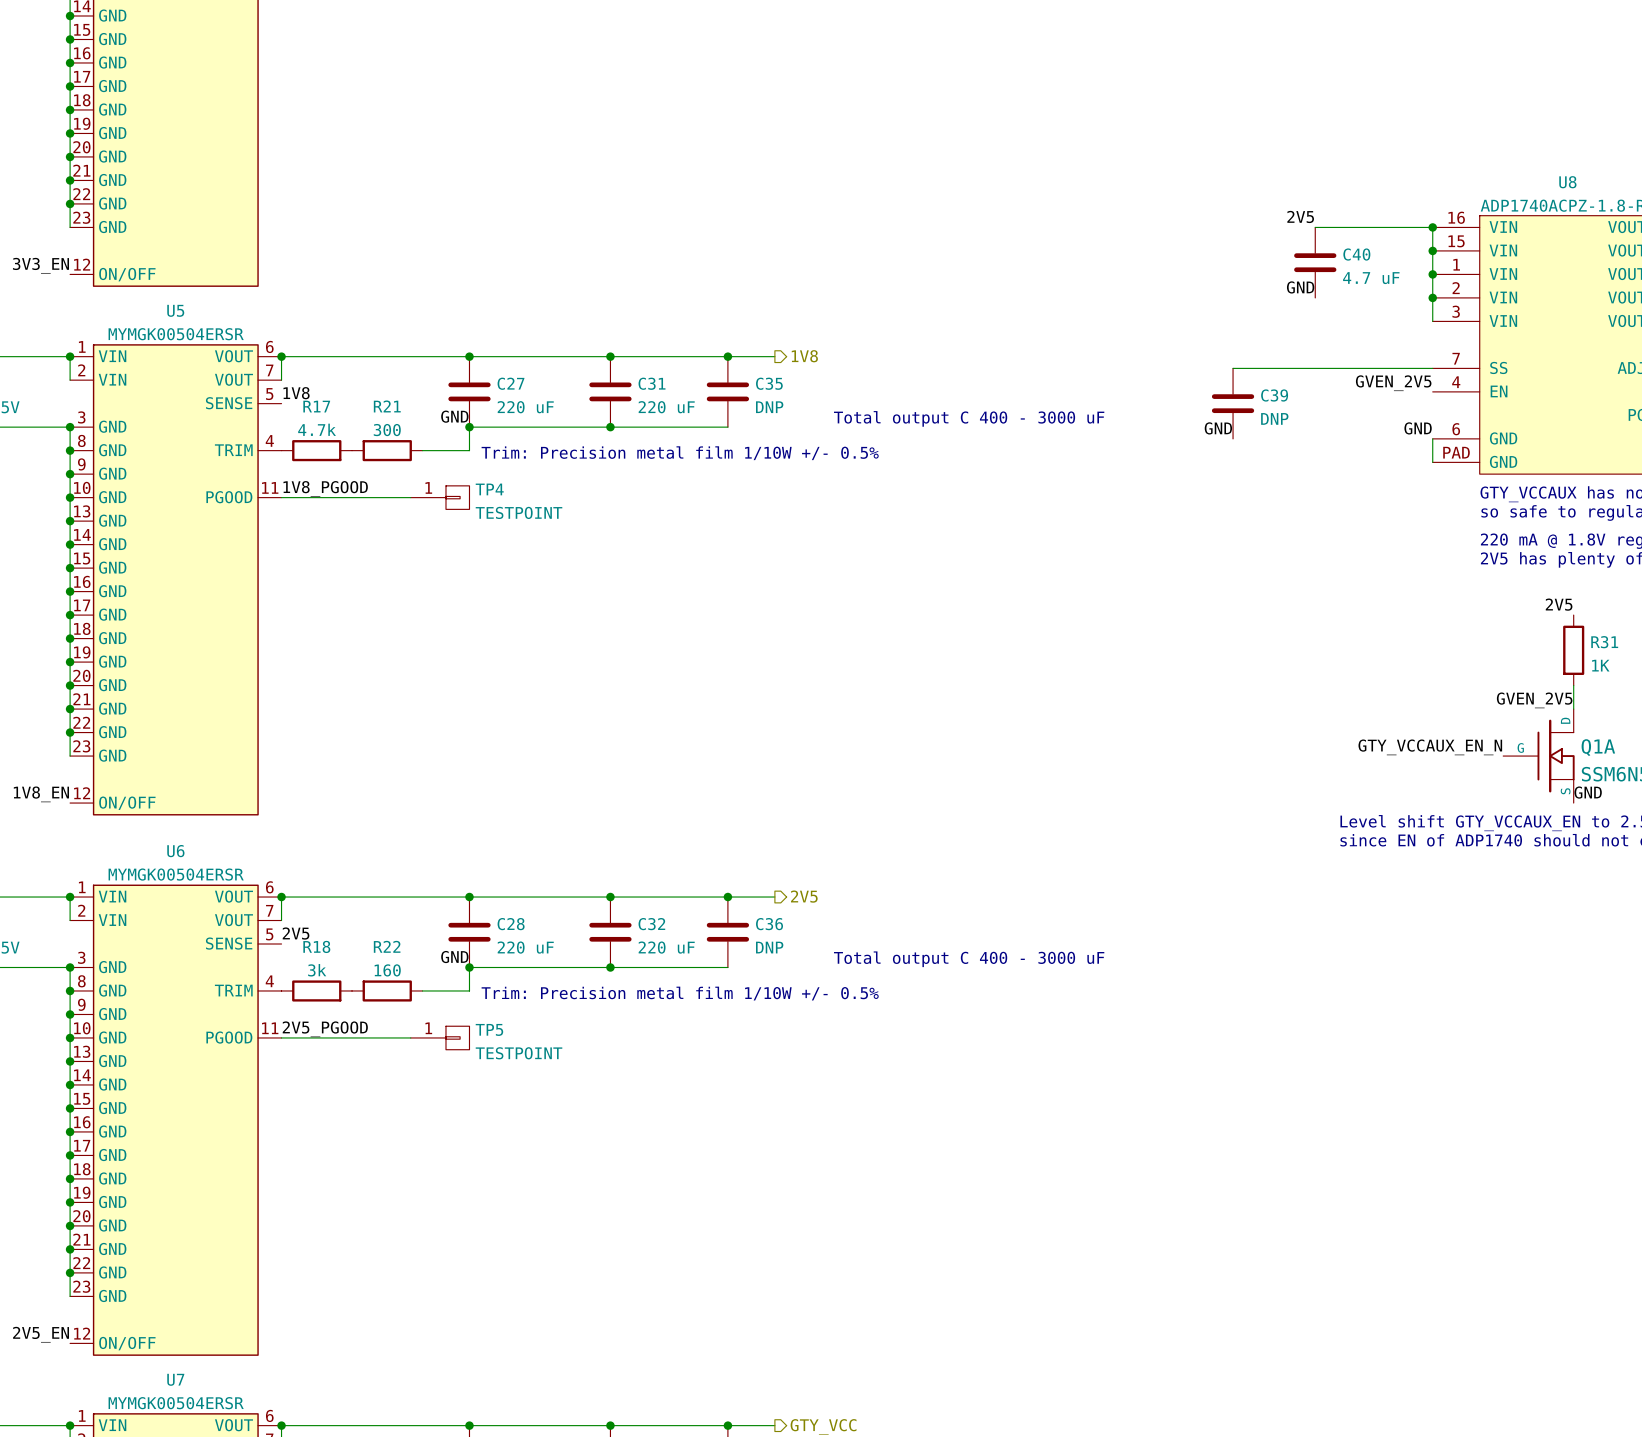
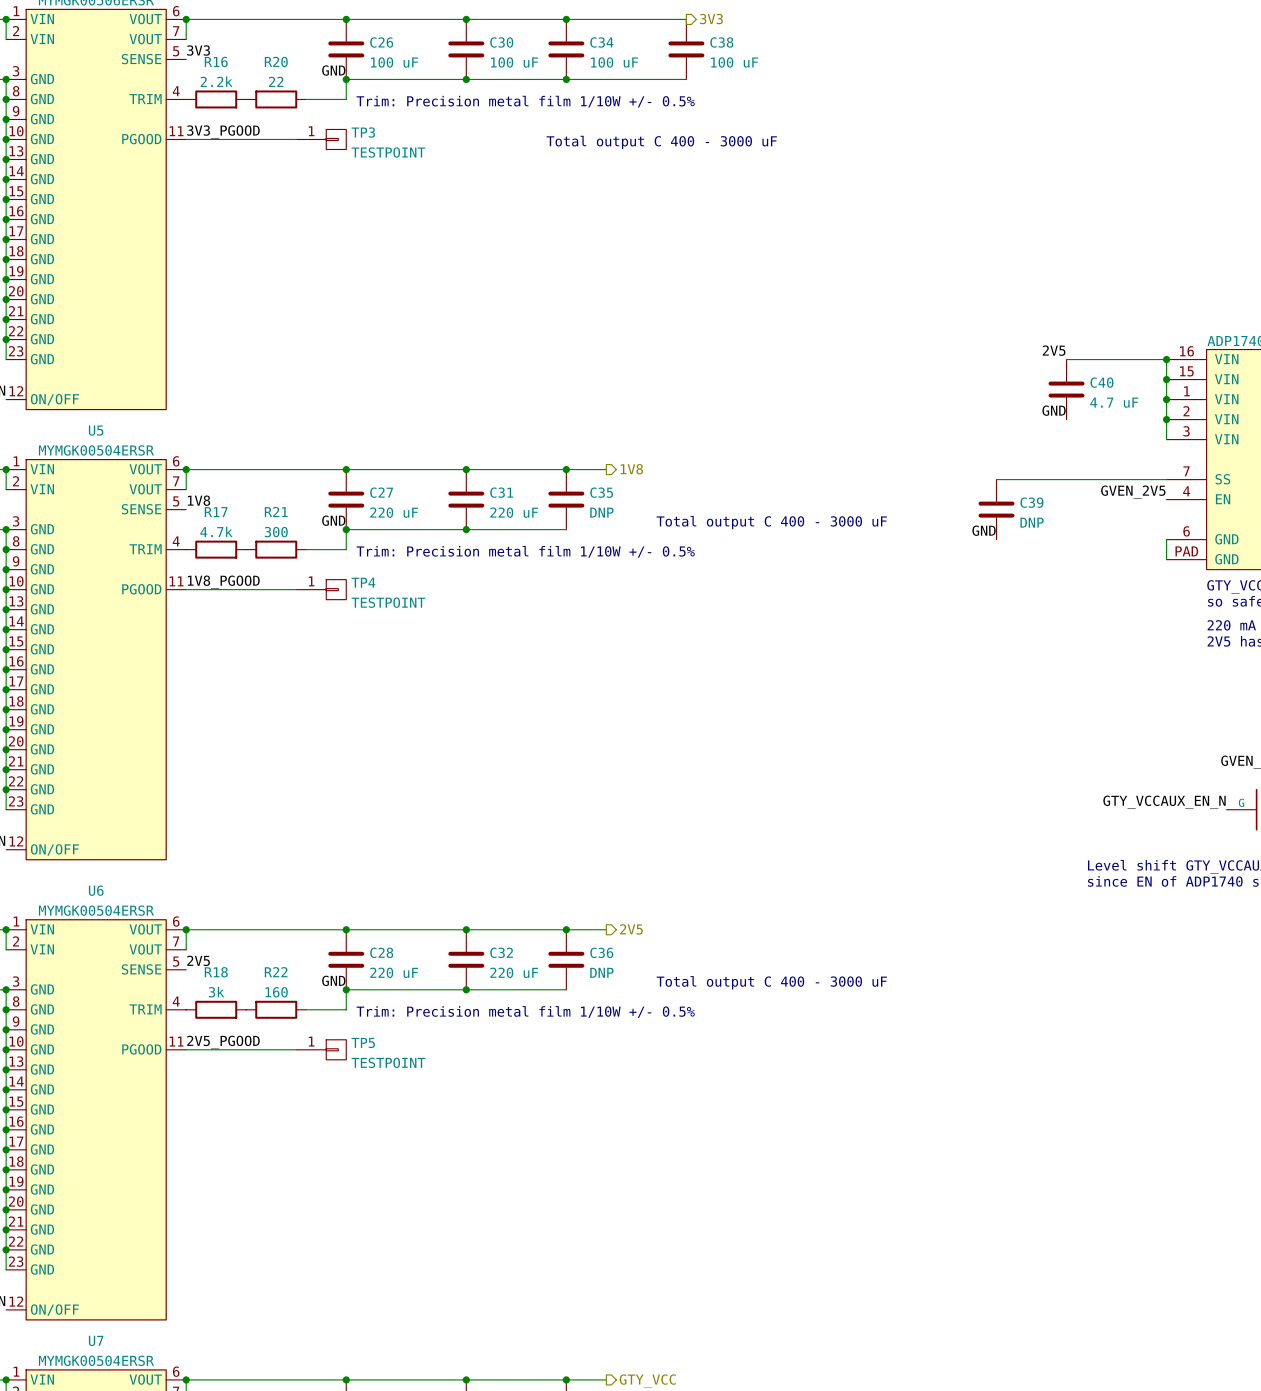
label: GND (1418, 428) -> none

